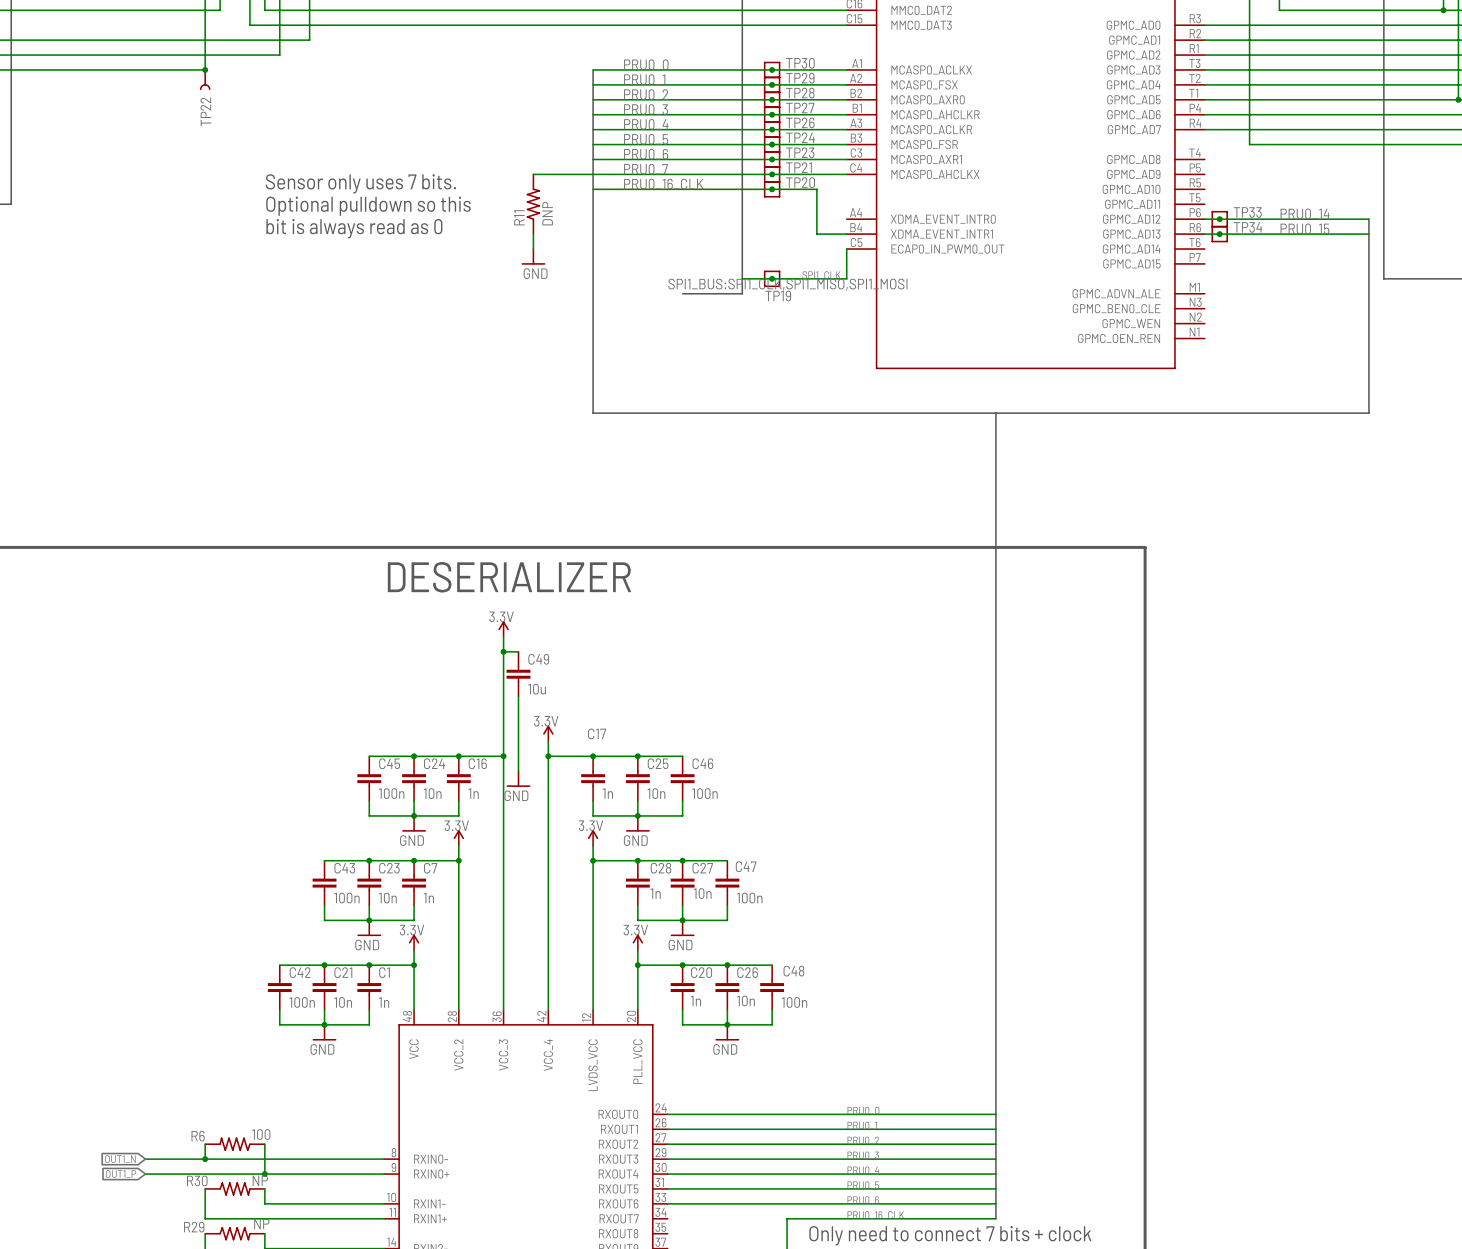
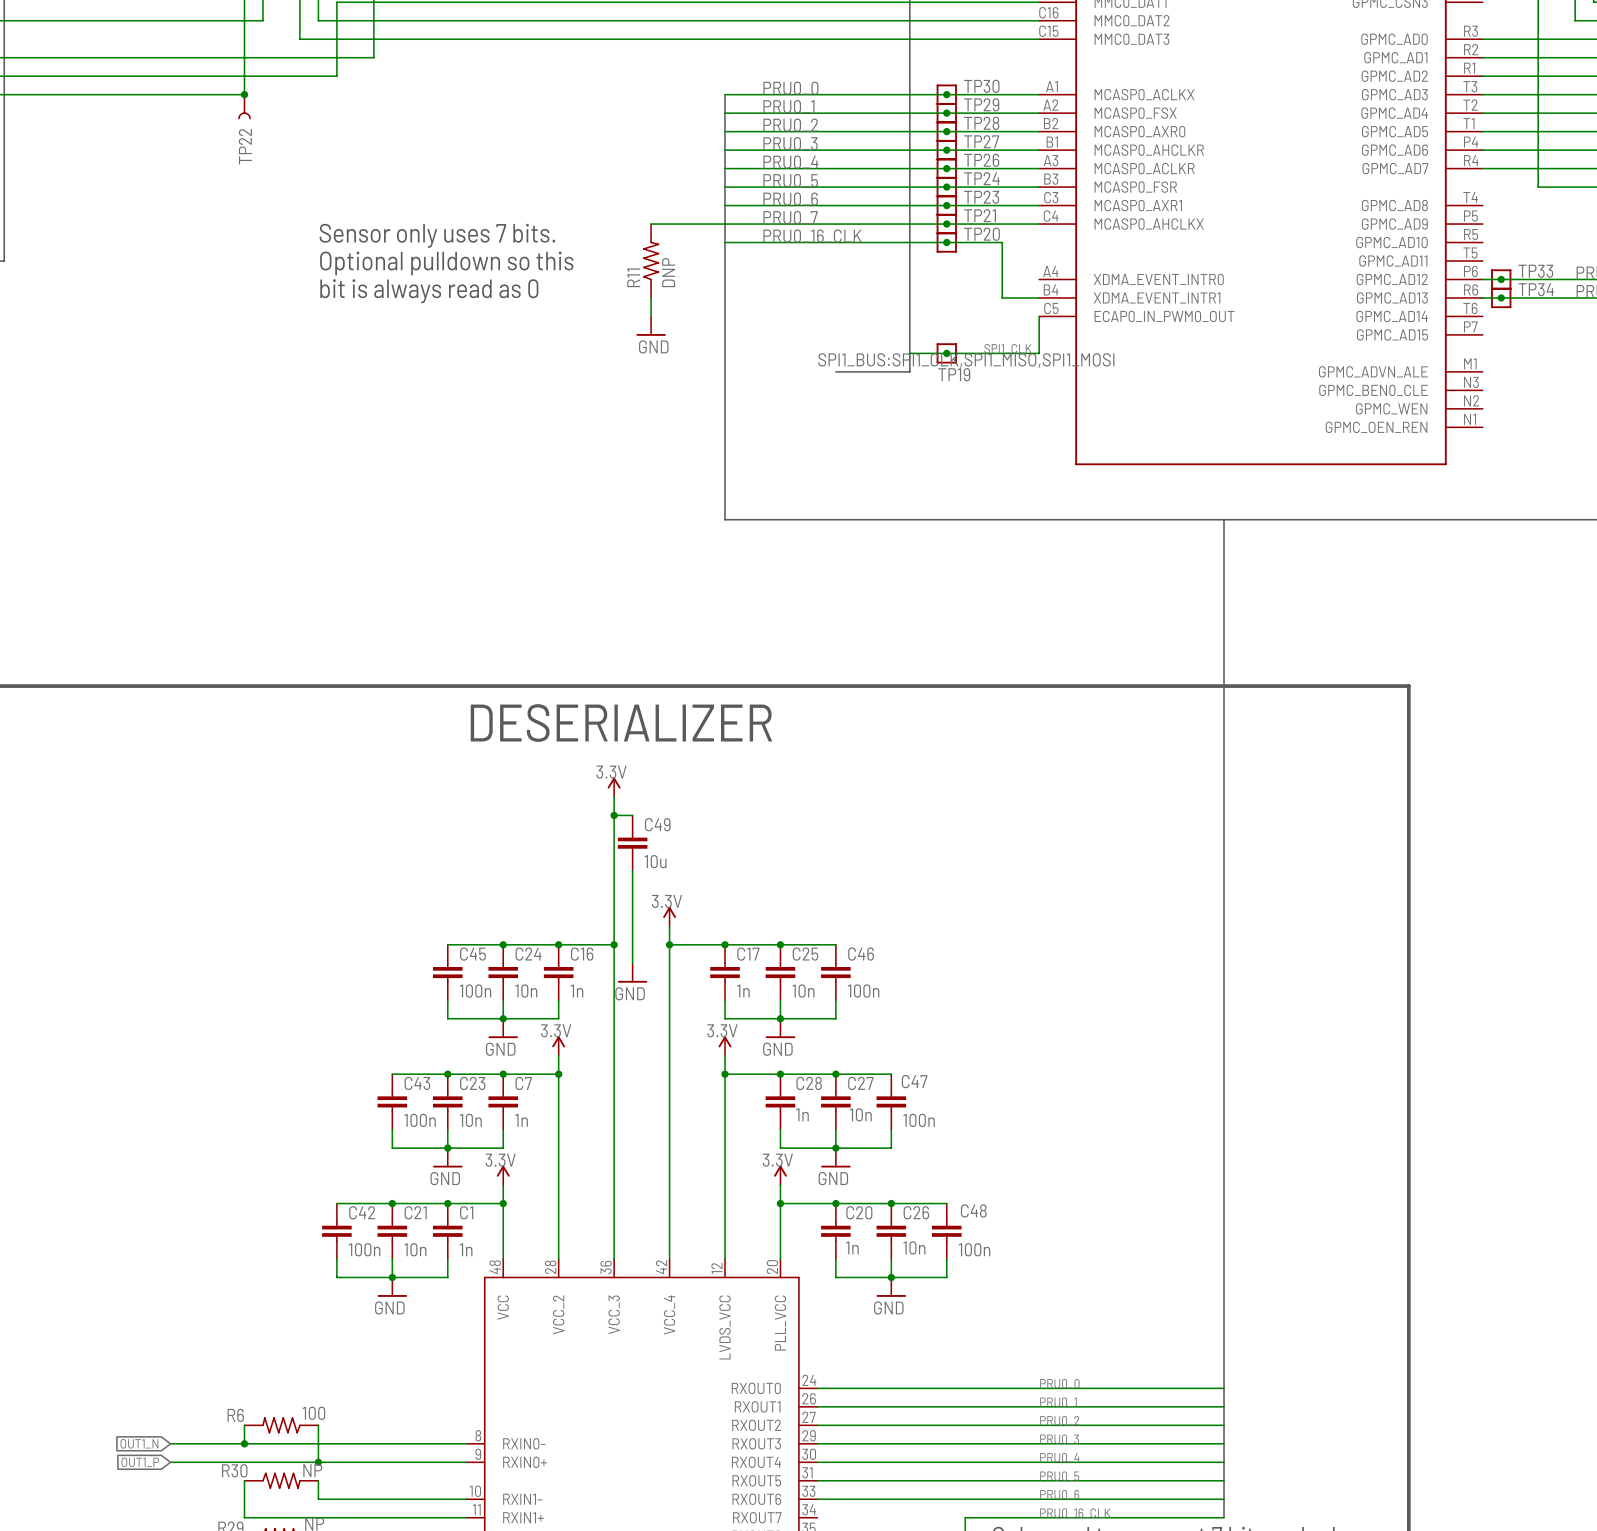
C17 name position: C17 (597, 733) -> C17 (748, 954)

